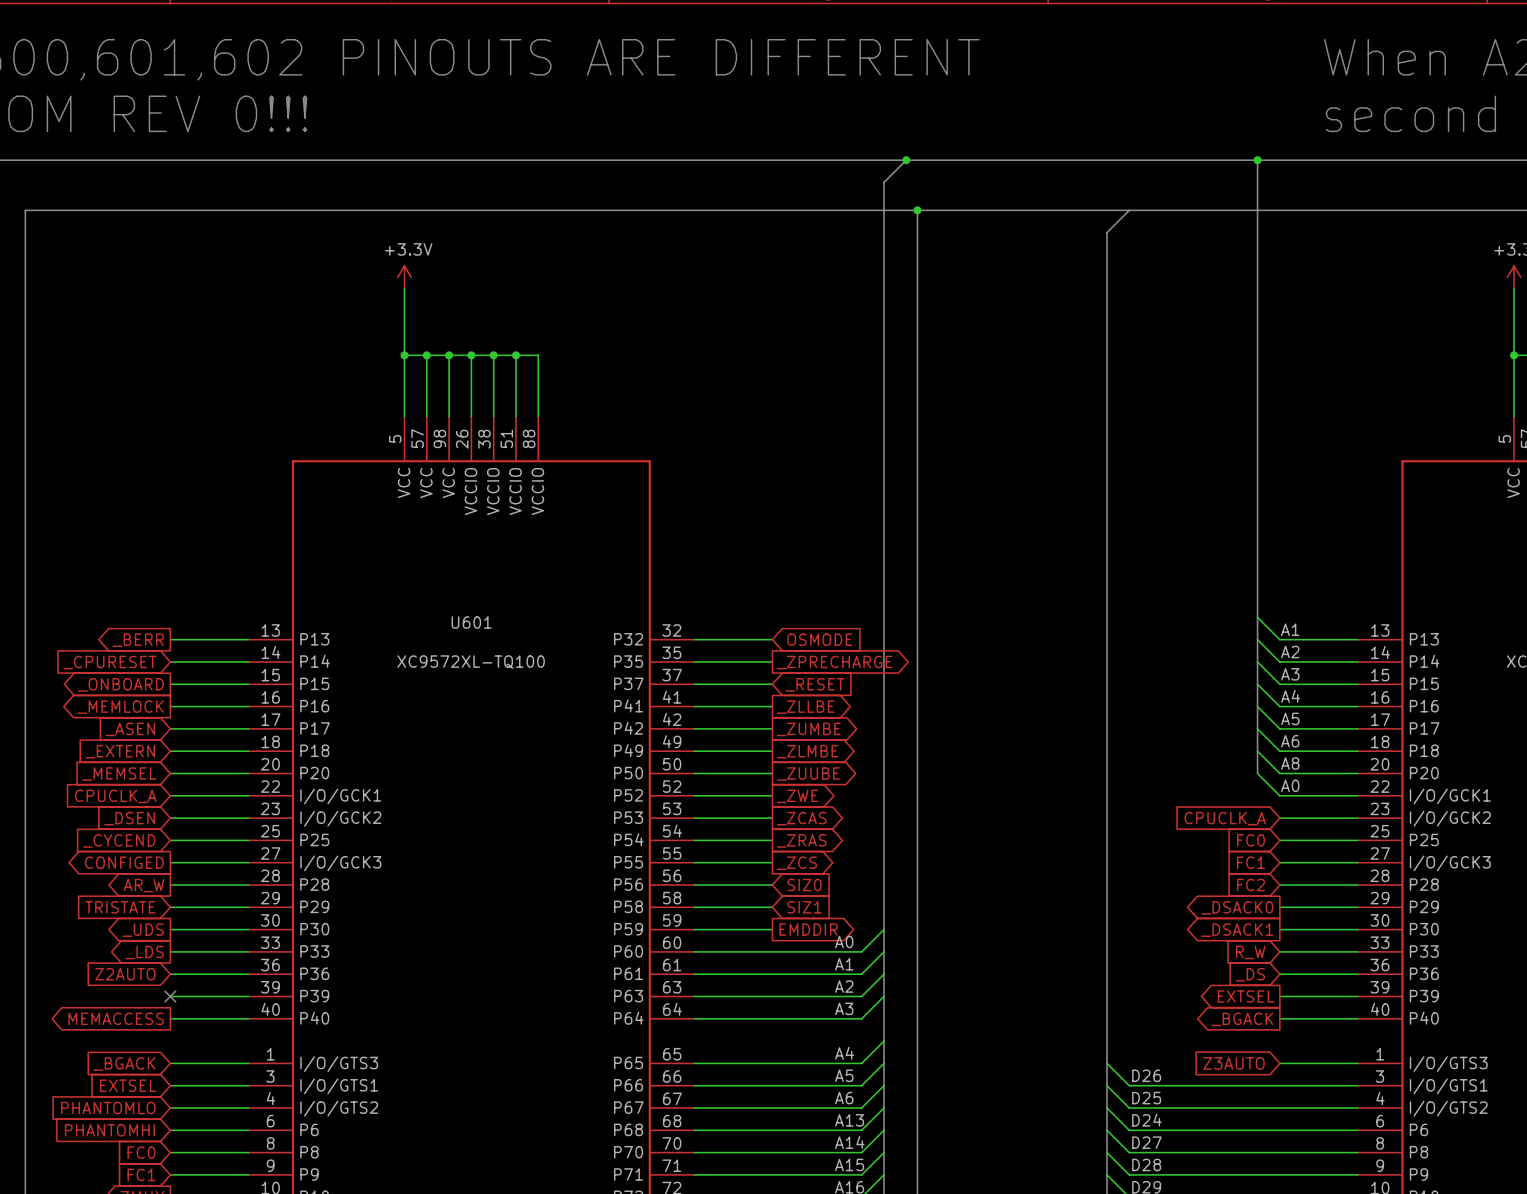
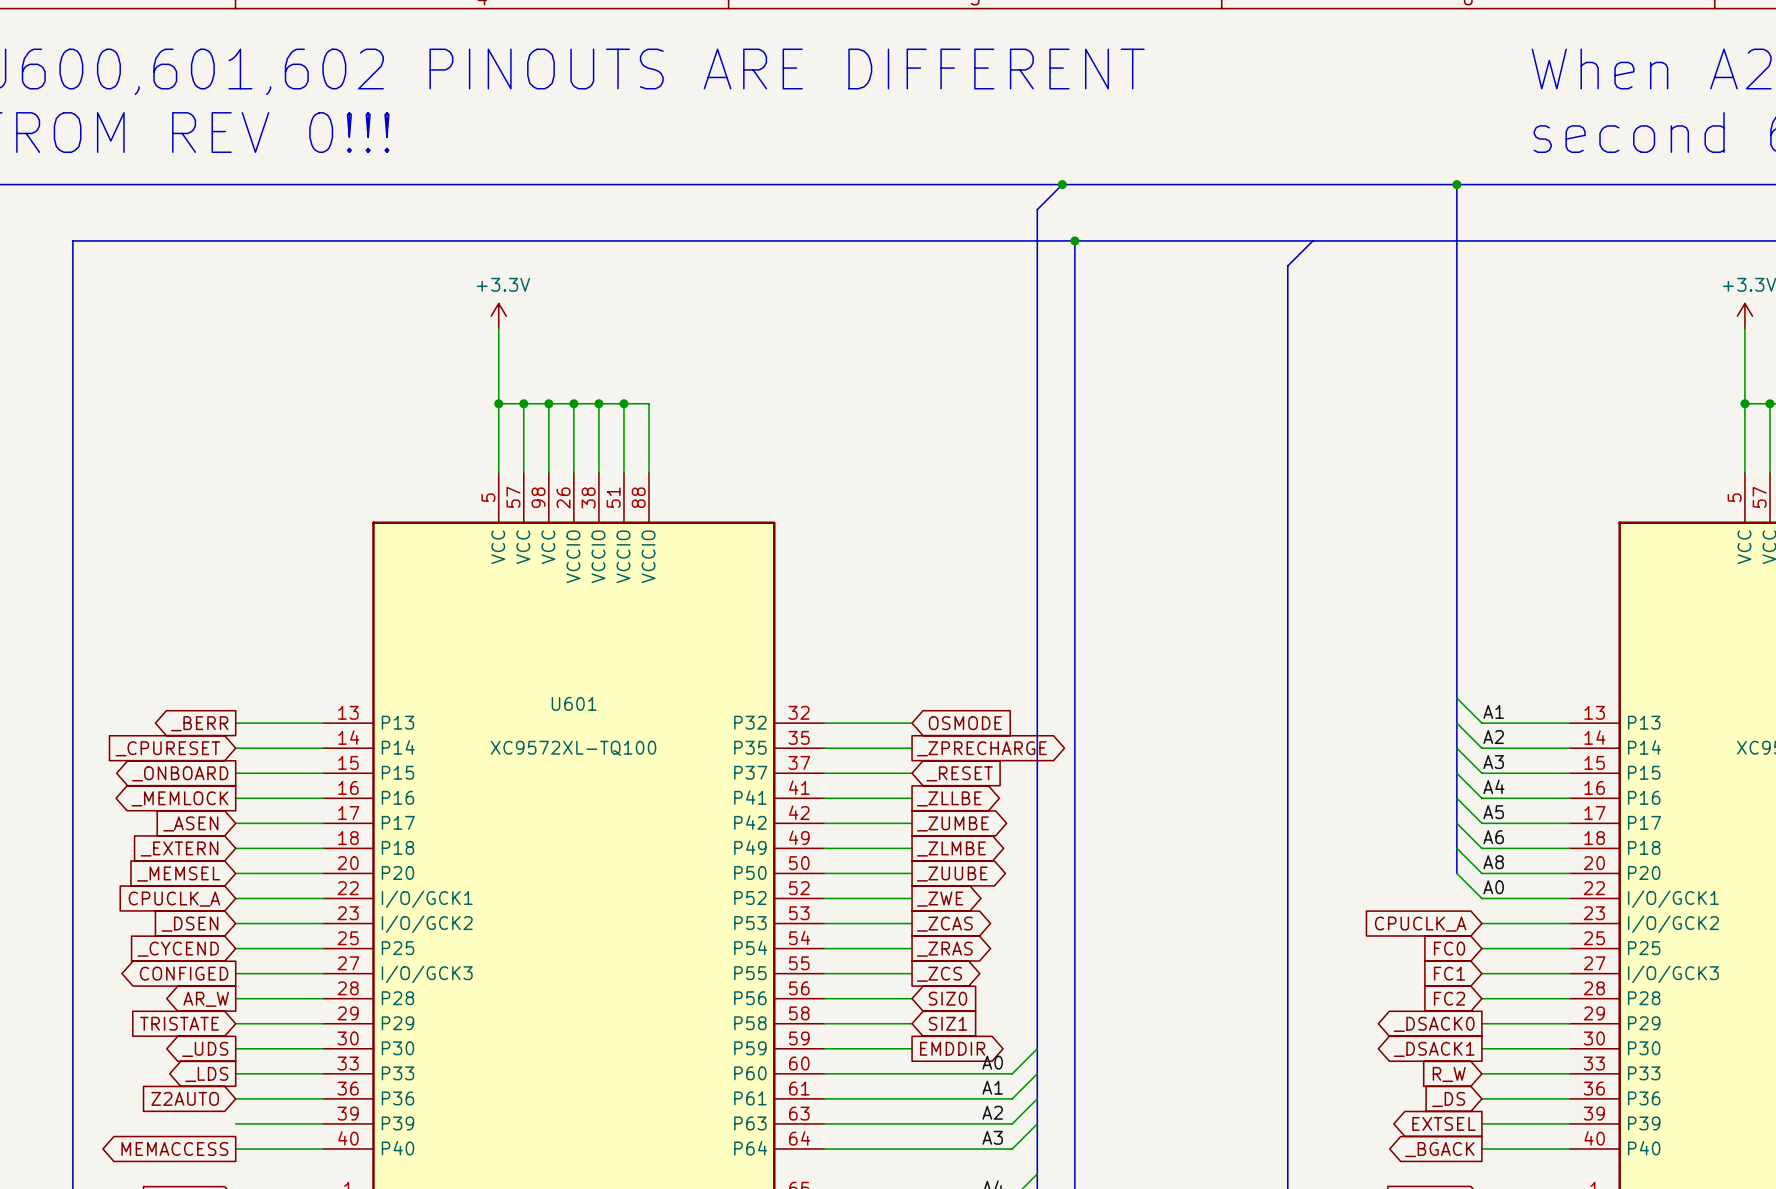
no-connect mark: (170, 996) -> none

